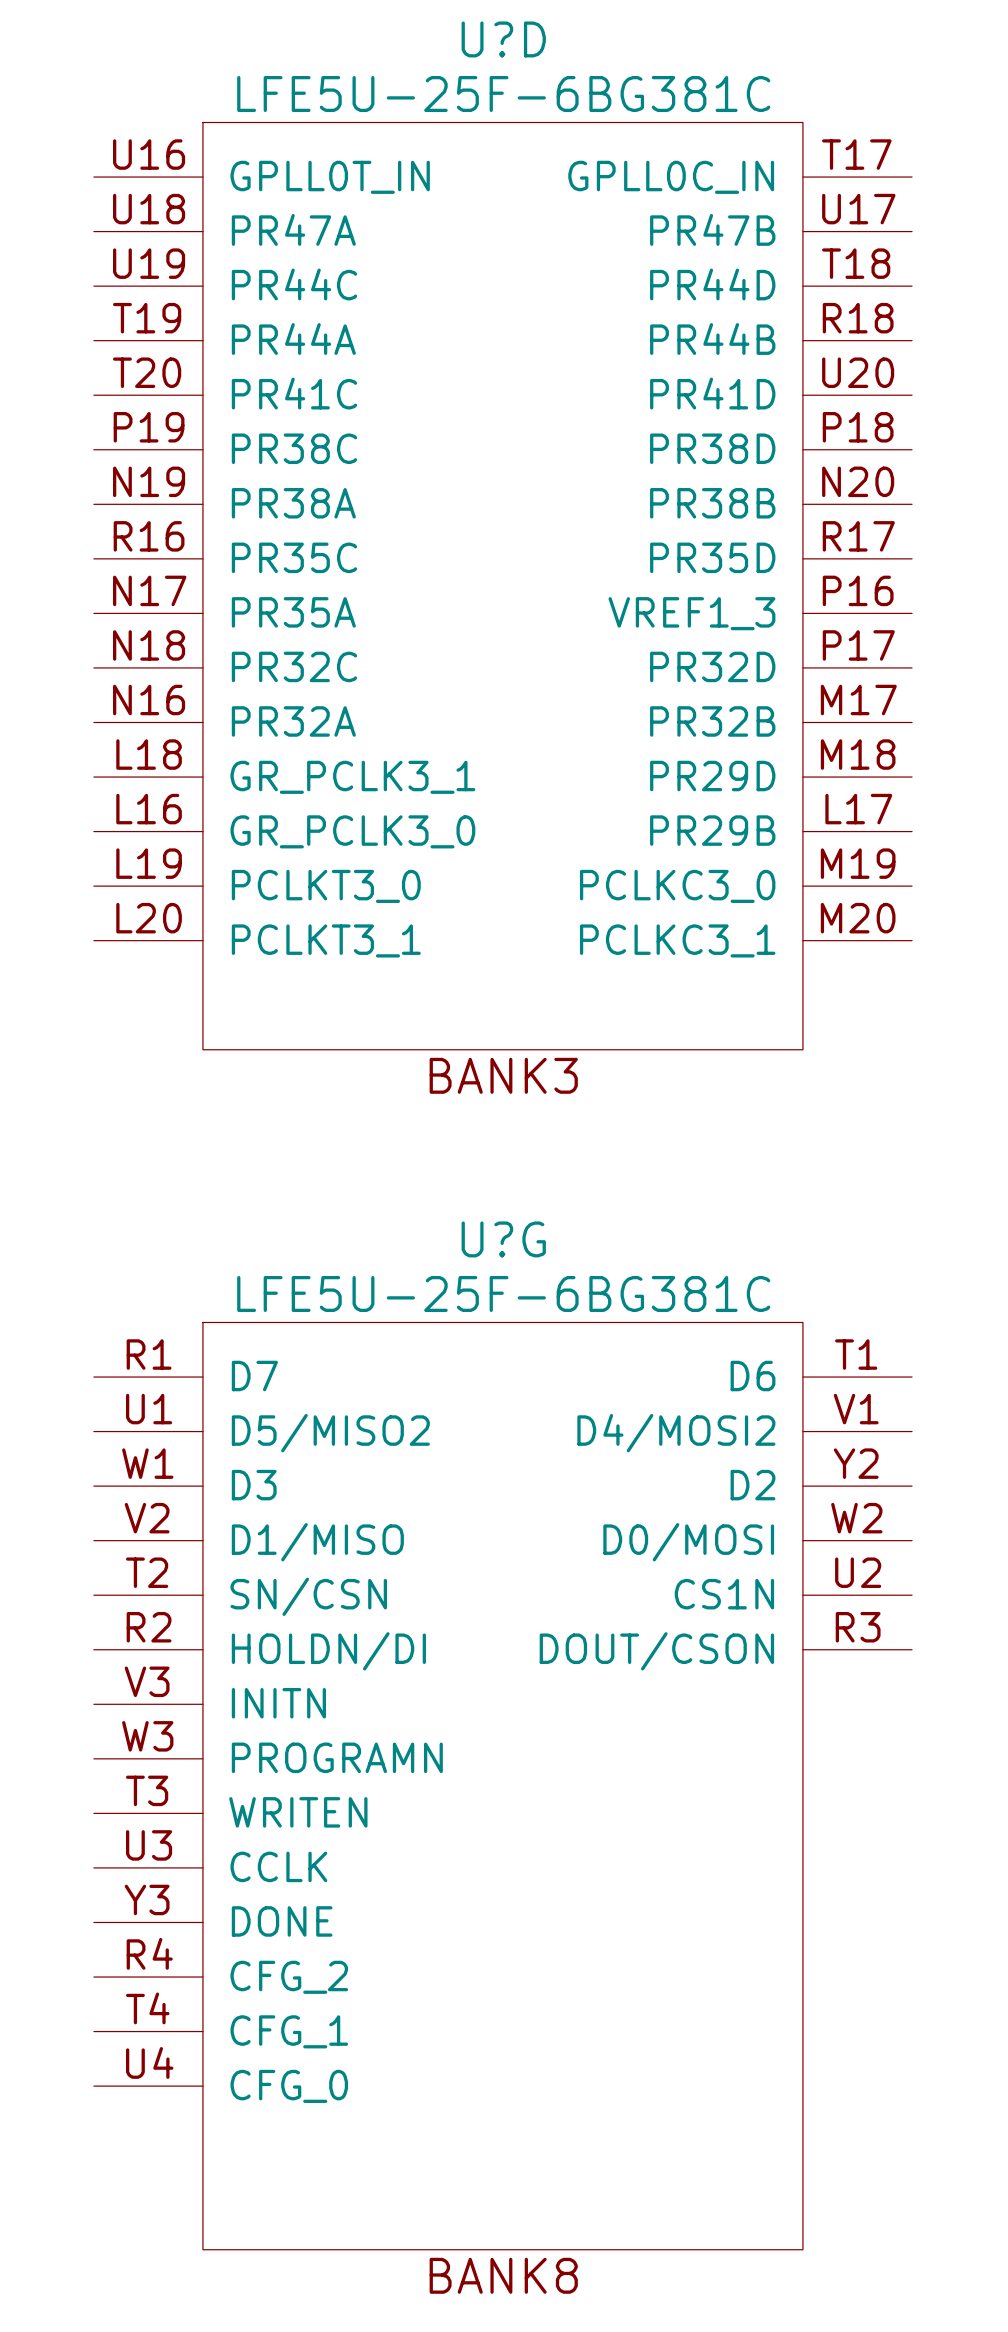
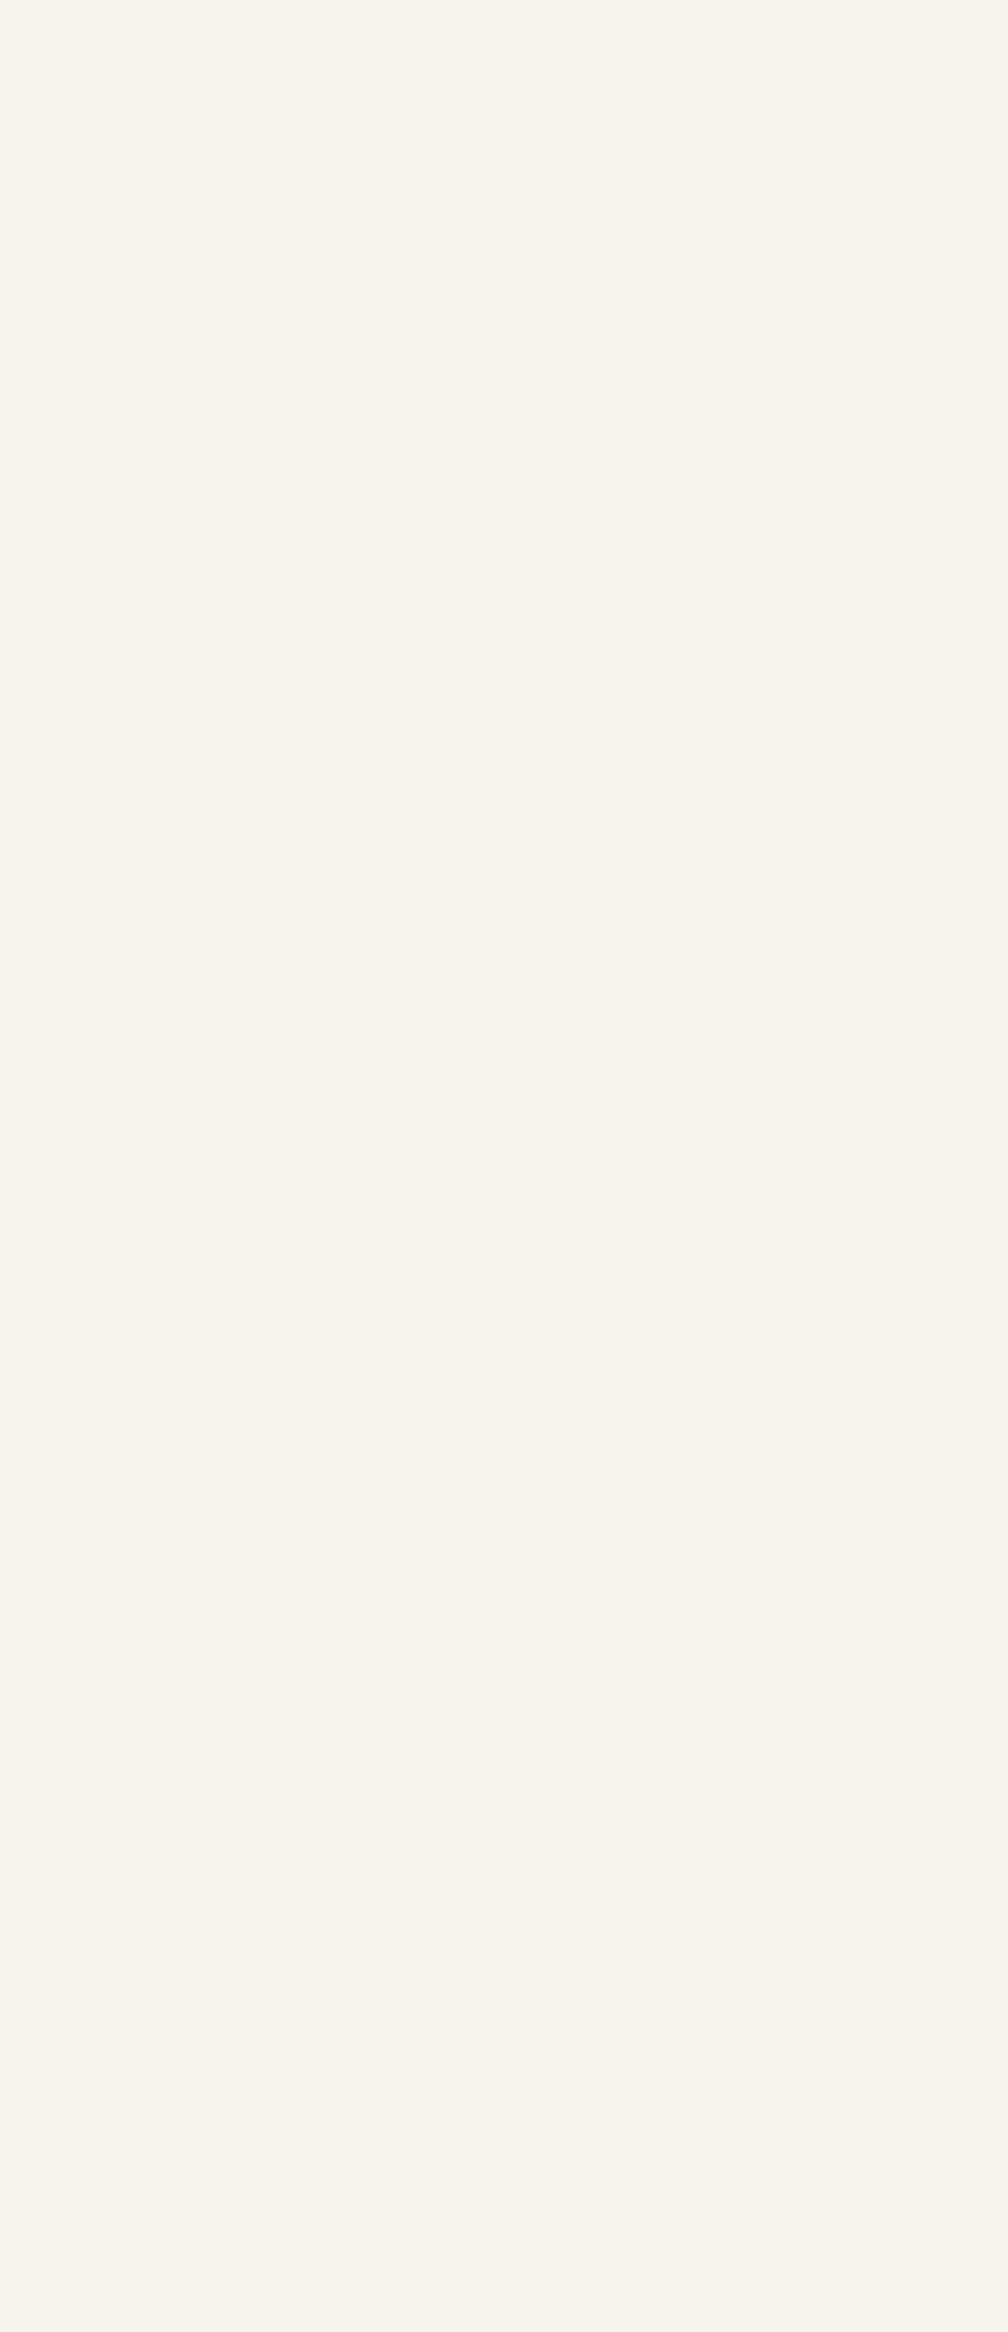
U?D: LFE5U-25F-6BG381C (502, 586) -> none
U?G: LFE5U-25F-6BG381C (502, 1786) -> none

